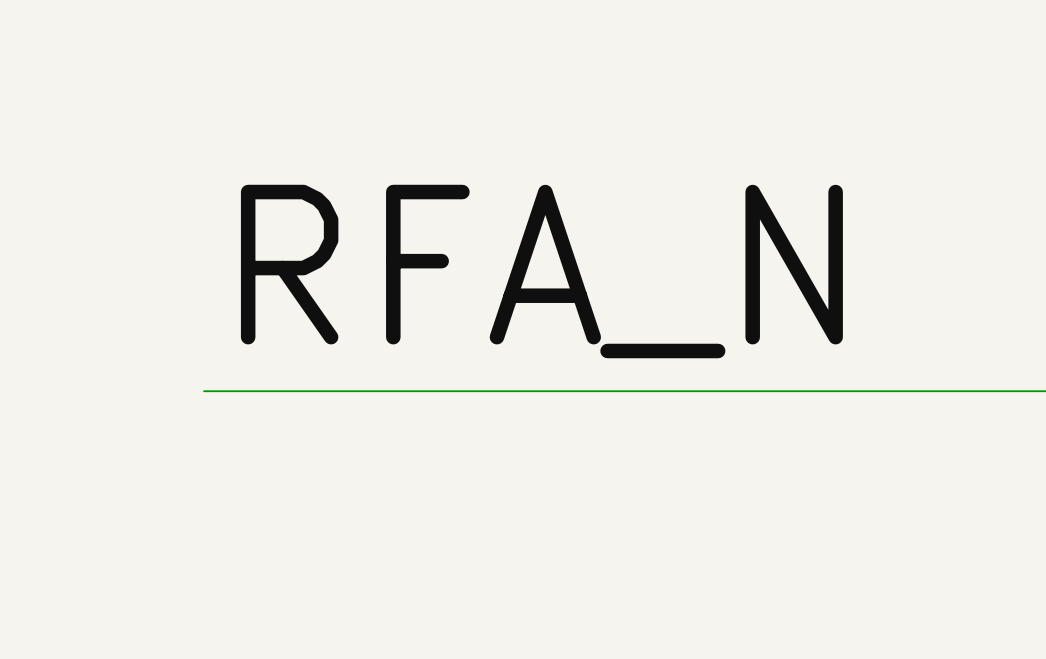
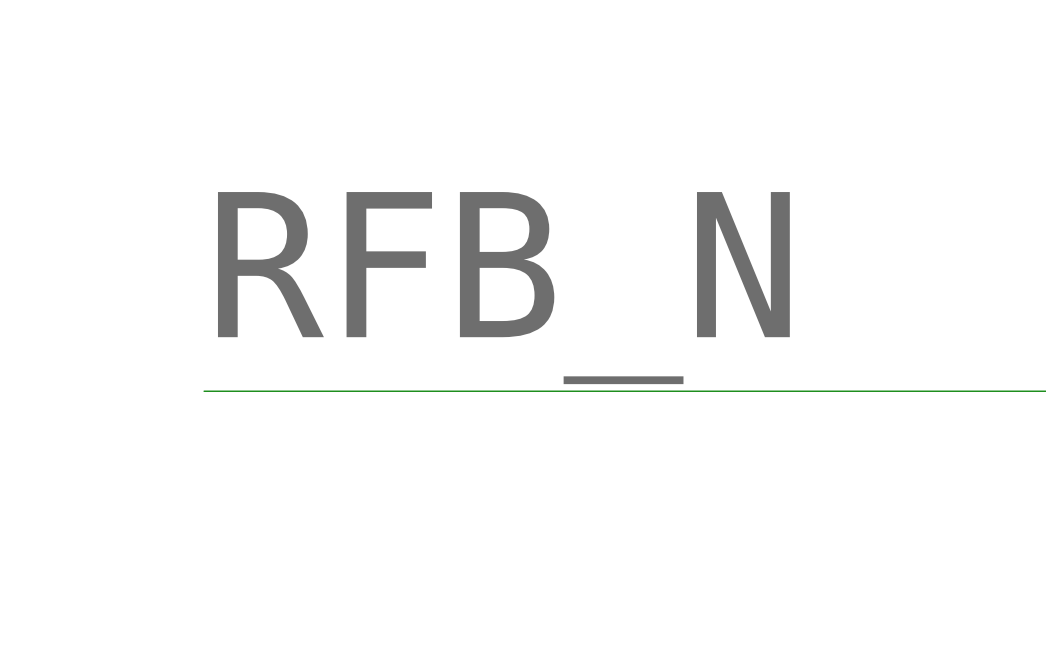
label: RFA_N (541, 271) -> RFB_N (503, 288)

